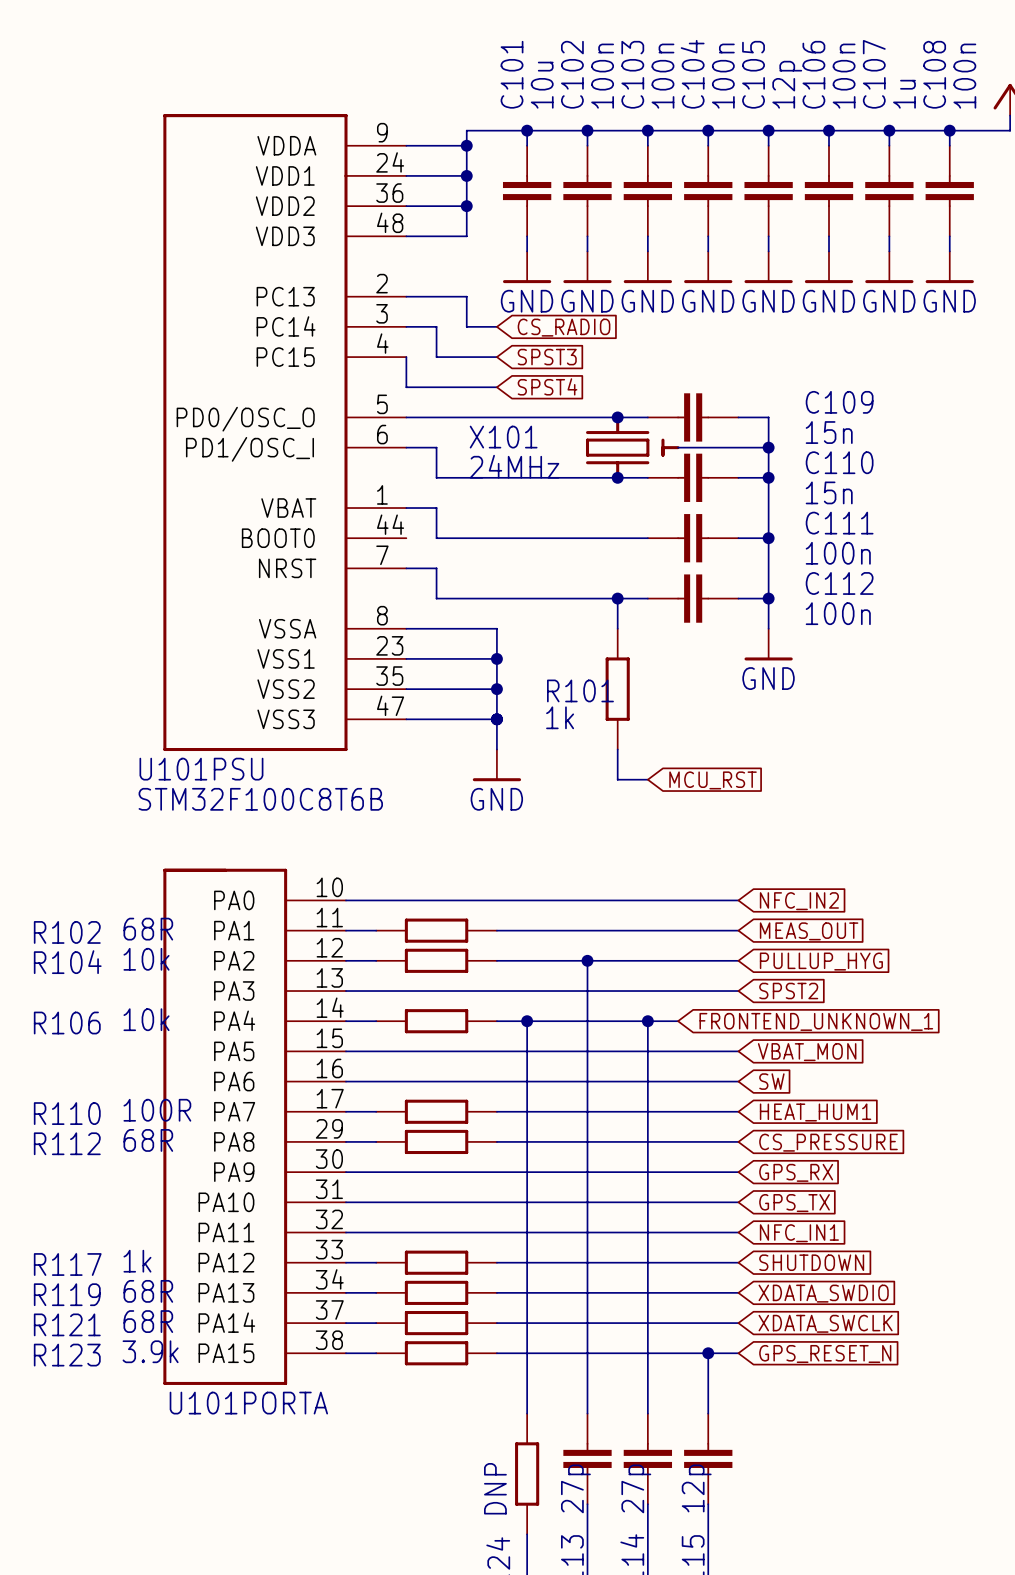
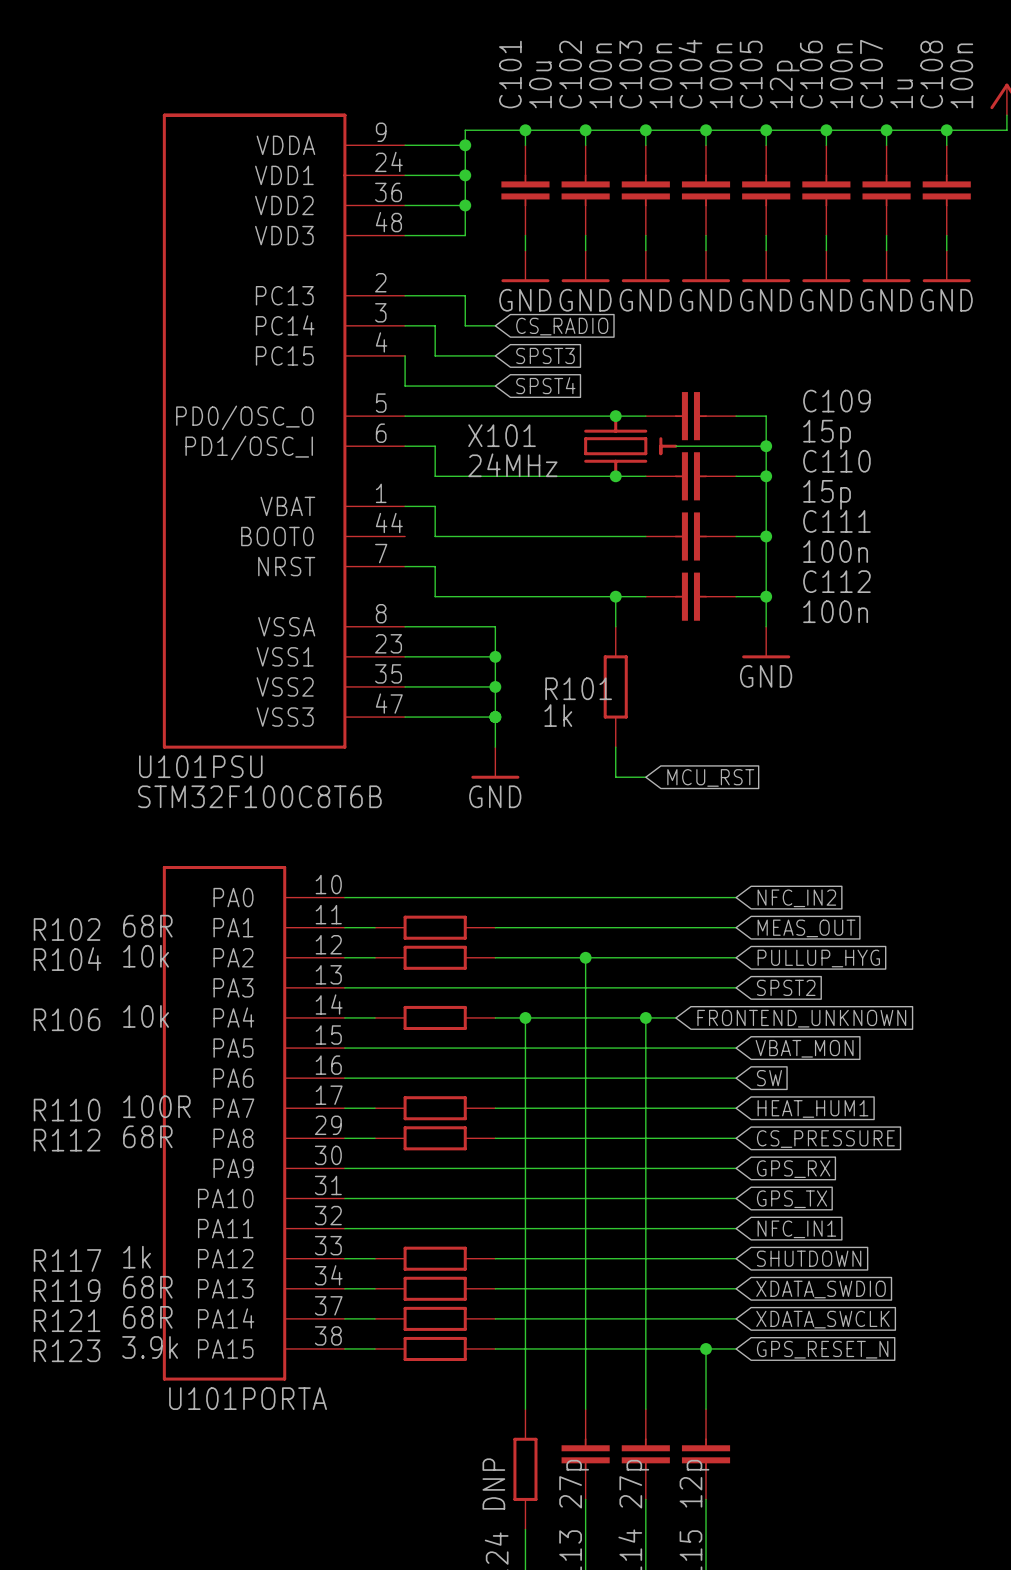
C109 value: 15n (829, 432) -> 15p (827, 434)
C110 value: 15n (829, 492) -> 15p (827, 494)
global label: FRONTEND_UNKNOWN_1 (816, 1021) -> FRONTEND_UNKNOWN (801, 1018)

